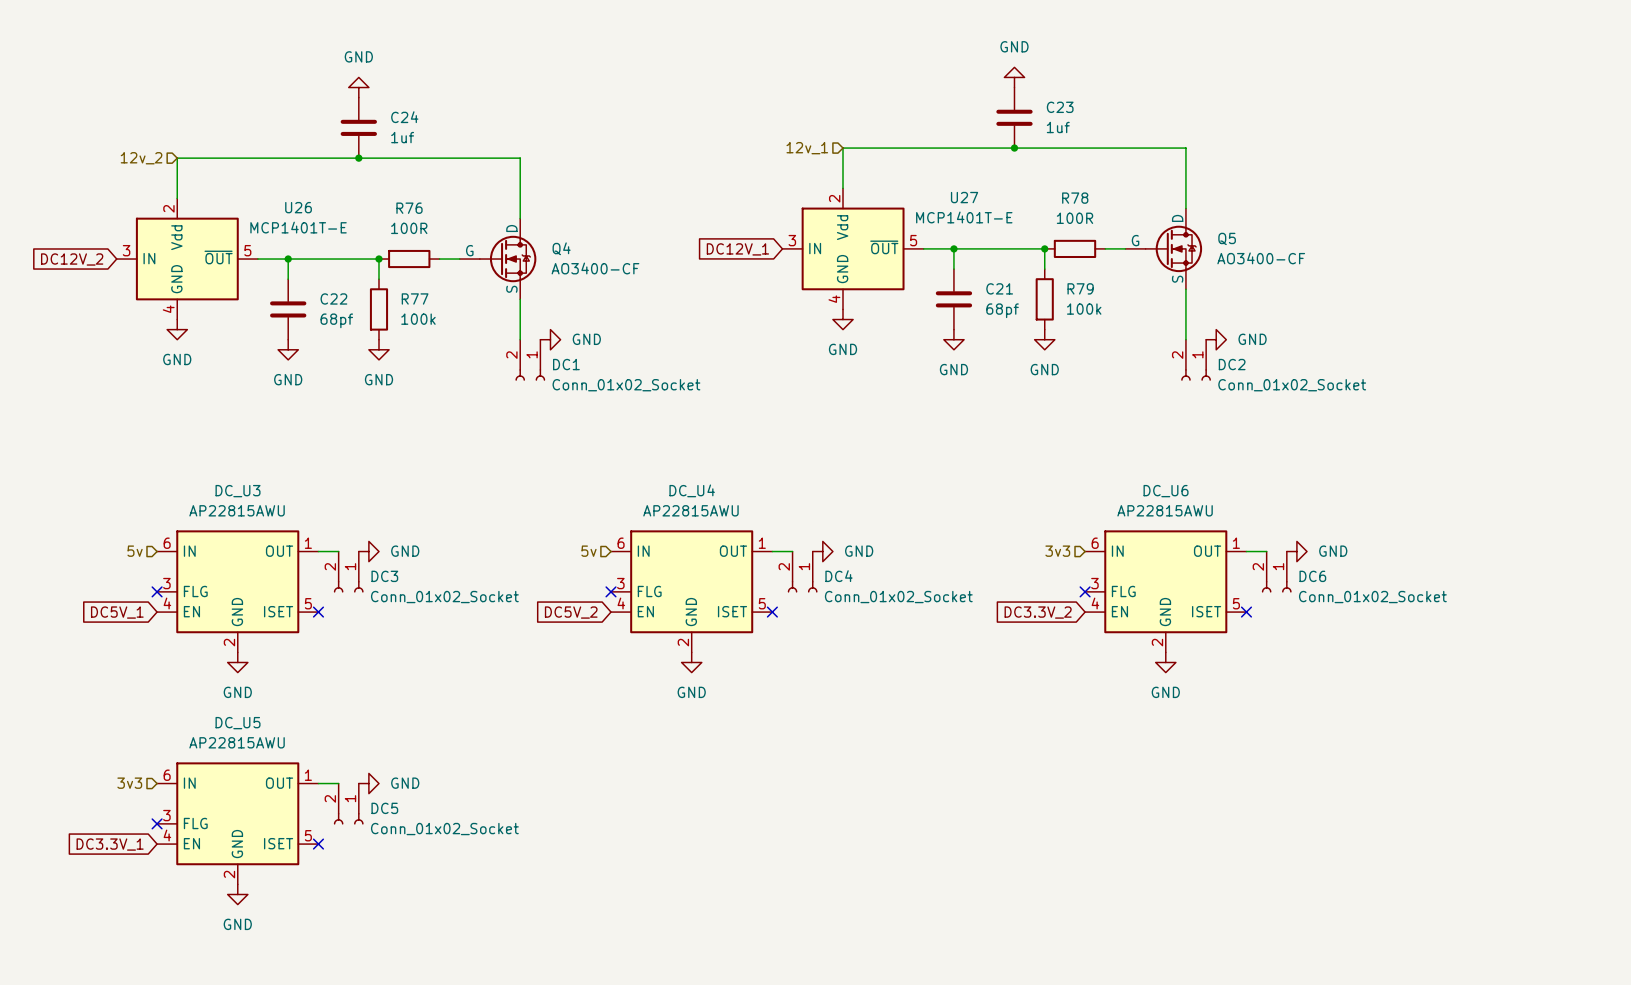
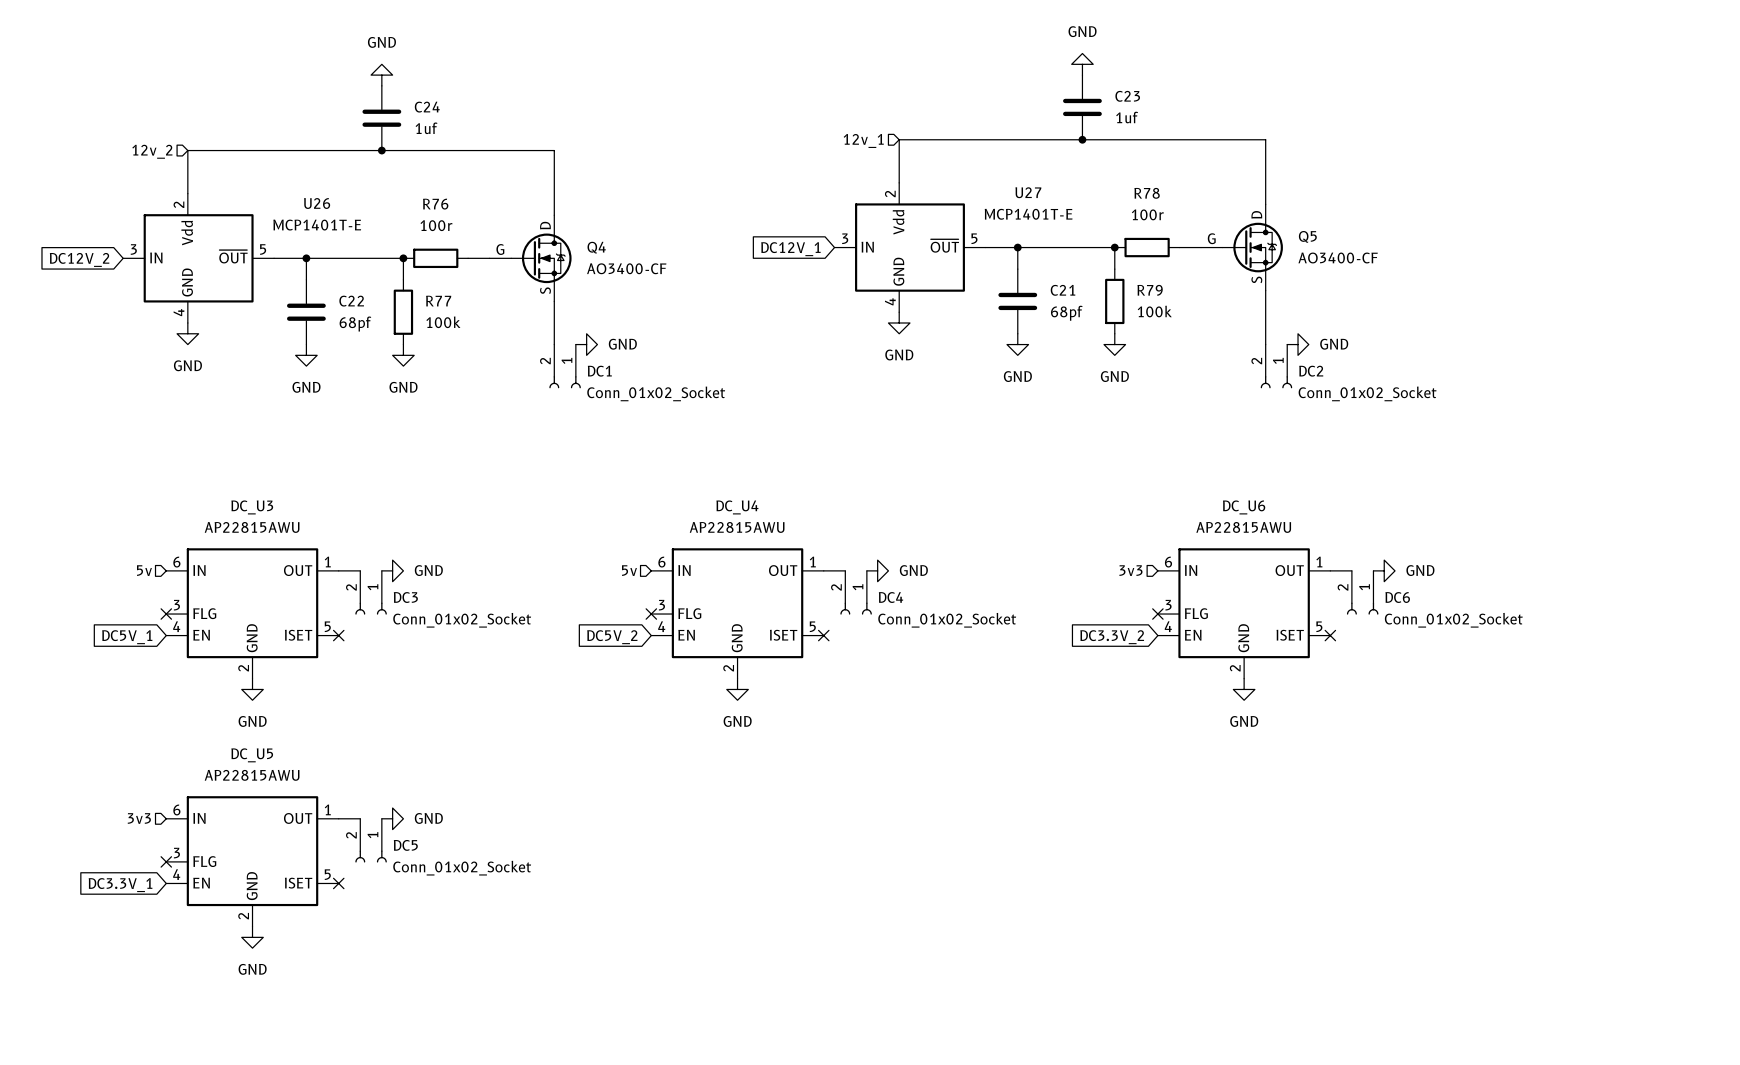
R78 value: 100R (1075, 218) -> 100r (1147, 214)
R76 value: 100R (409, 228) -> 100r (436, 225)

